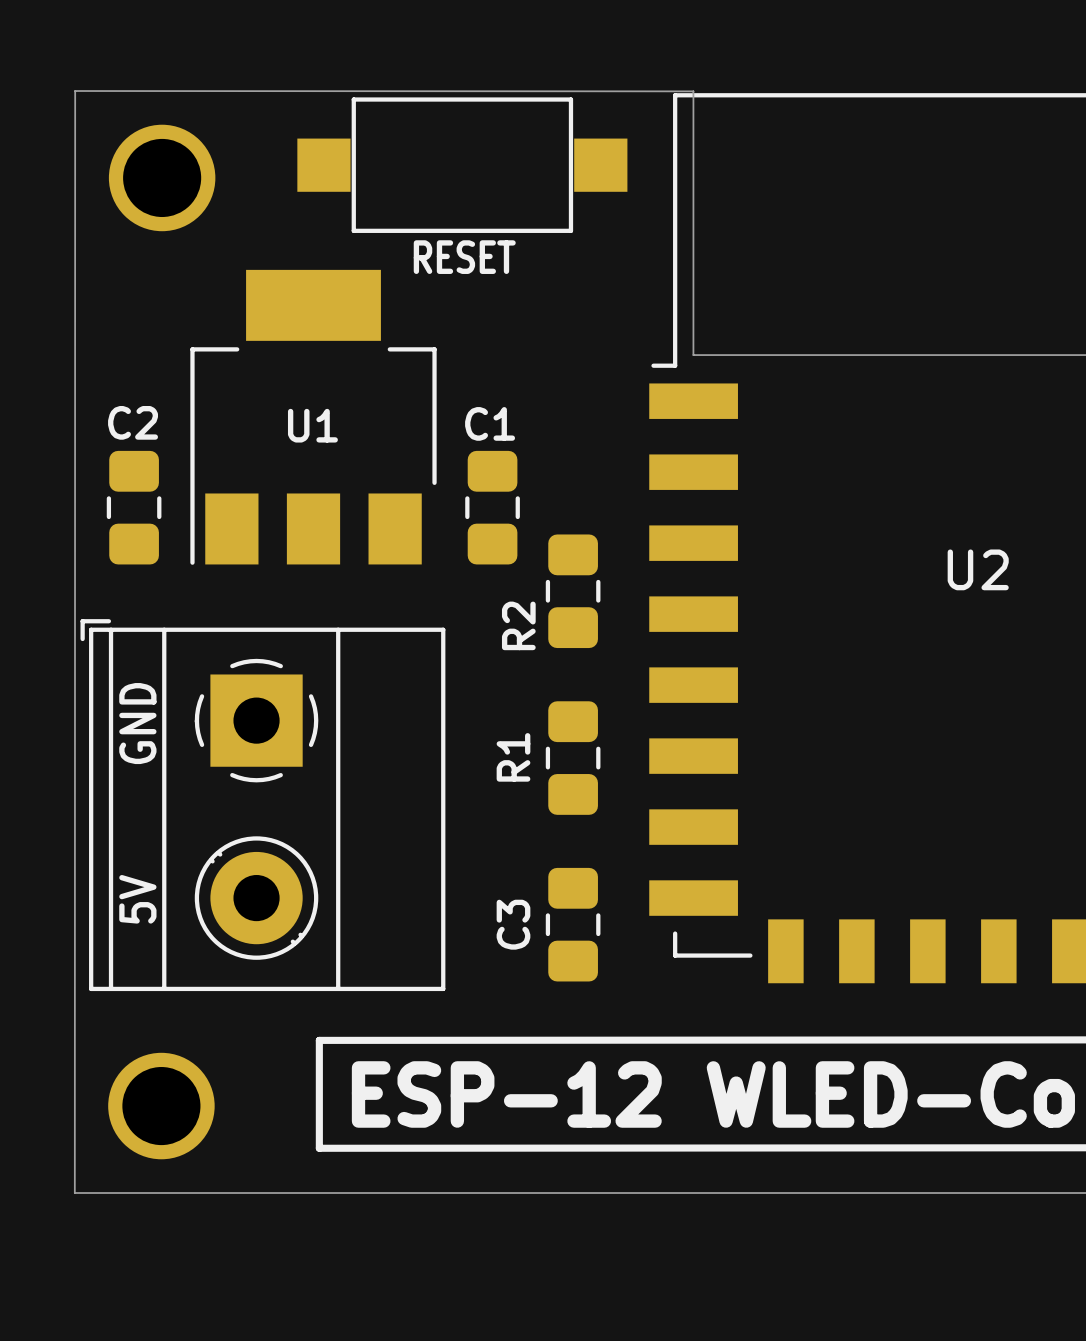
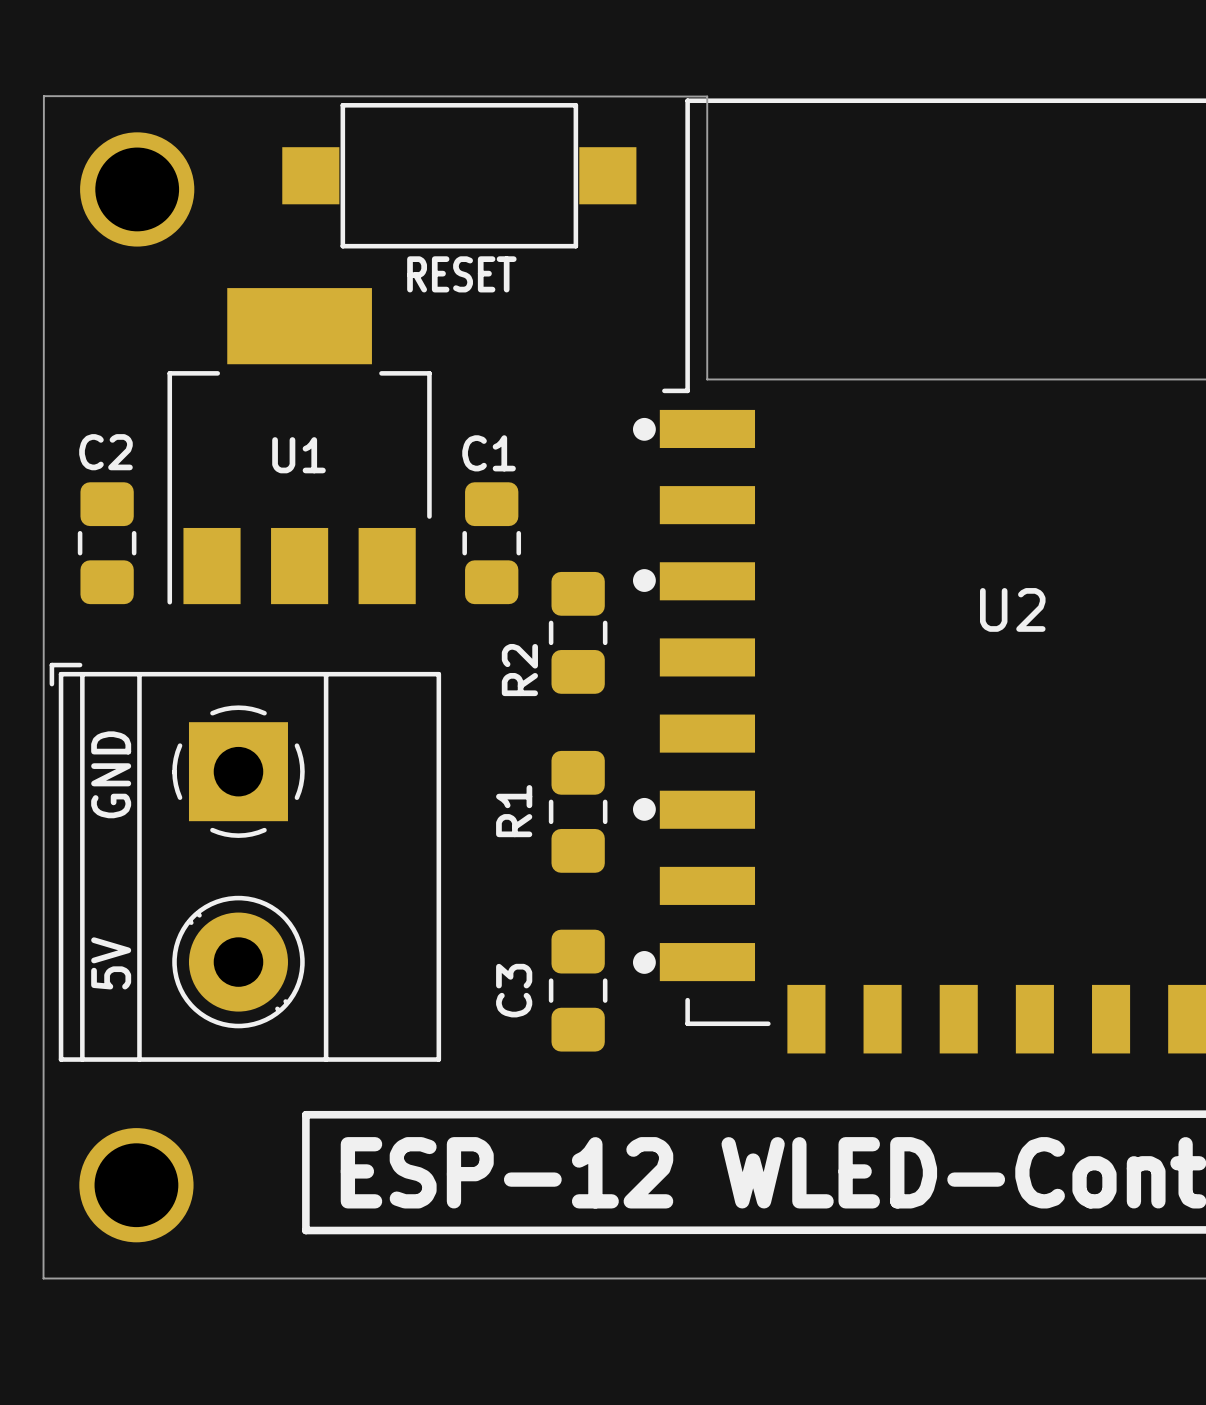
drawing: none -> [632, 417, 656, 441]
drawing: none -> [632, 569, 656, 592]
drawing: none -> [632, 797, 656, 821]
drawing: none -> [632, 951, 656, 974]

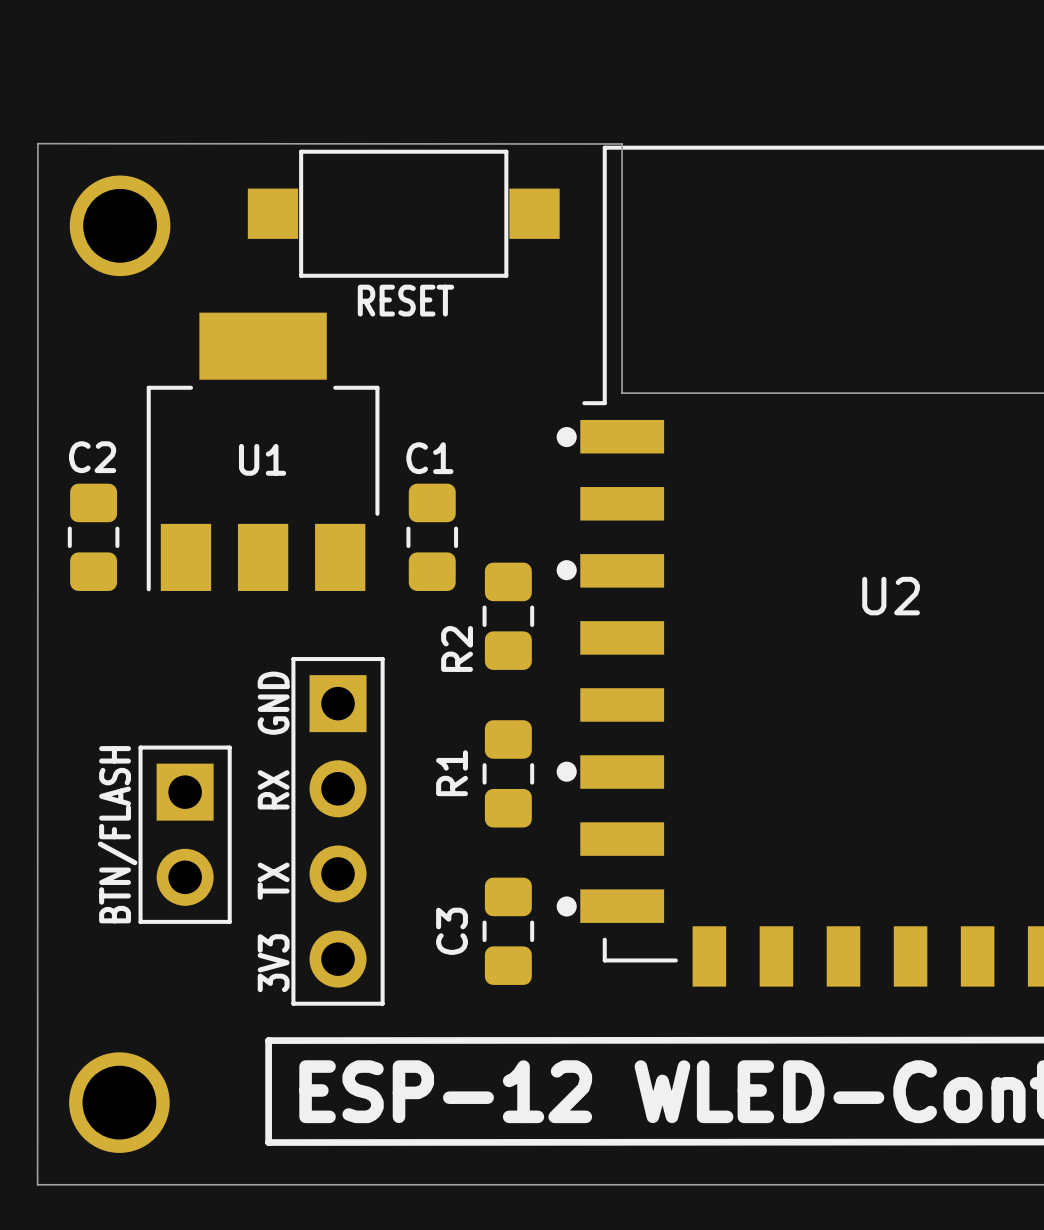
text: 5V GND (111, 860) -> BTN/FLASH (117, 834)
part: (245, 862) -> none
text: none -> 3V3 TX RX GND (273, 831)
part: none -> (338, 831)
part: none -> (185, 834)

